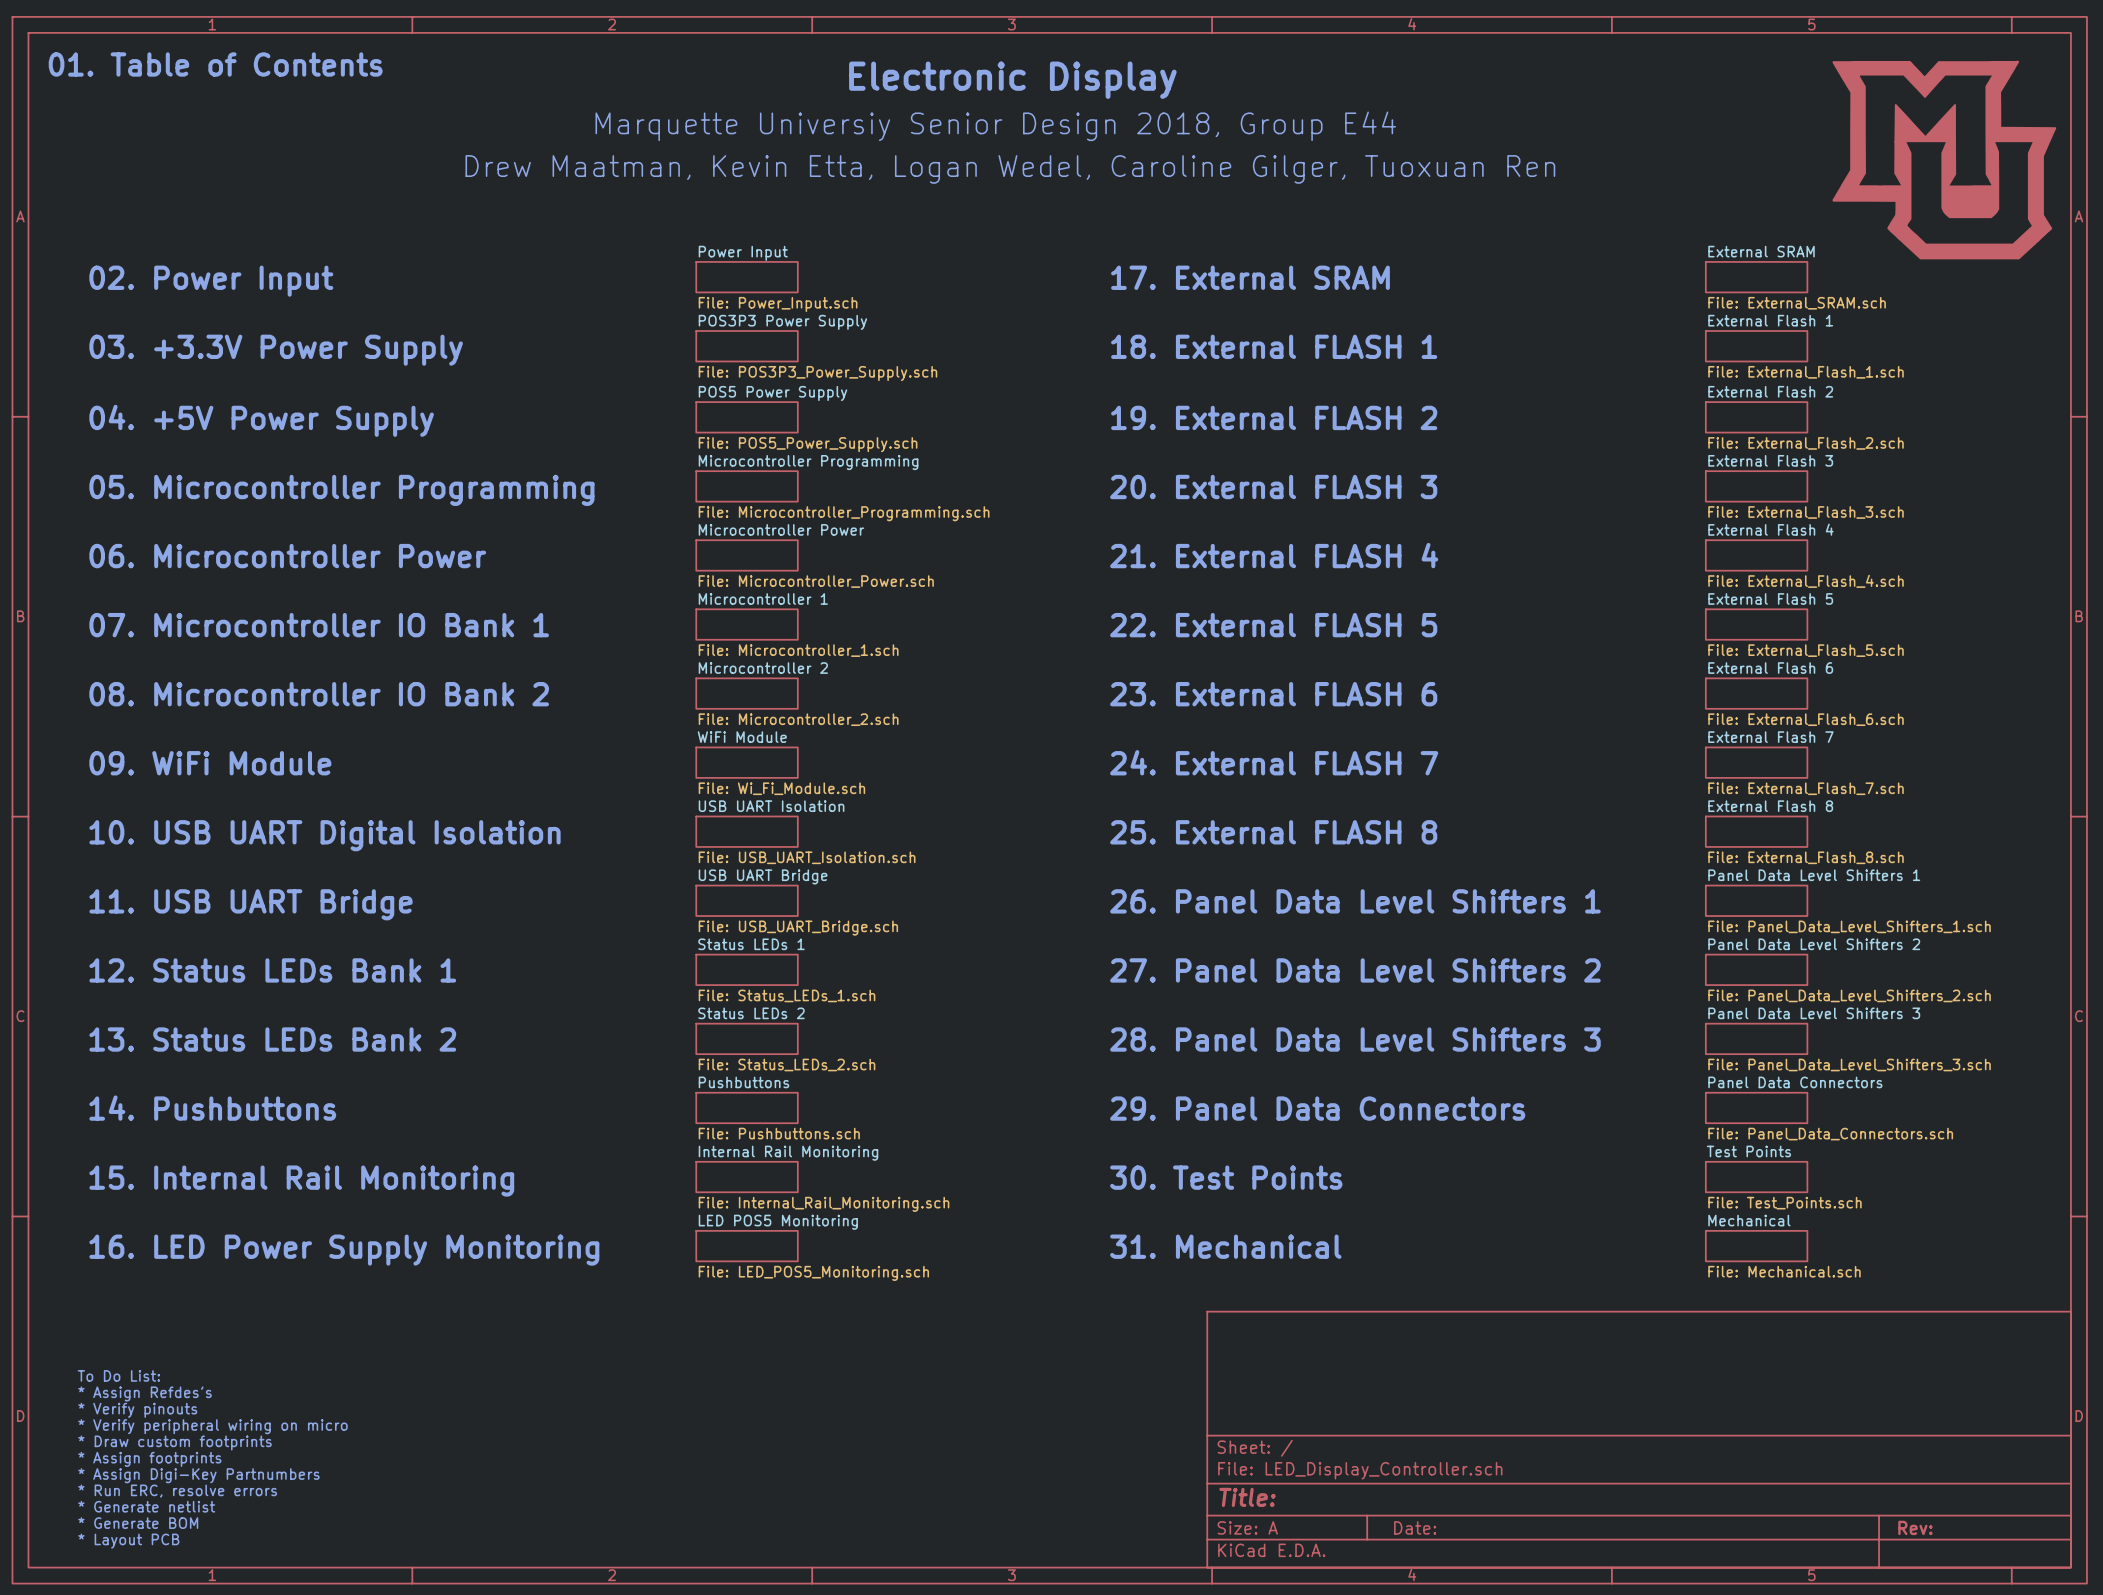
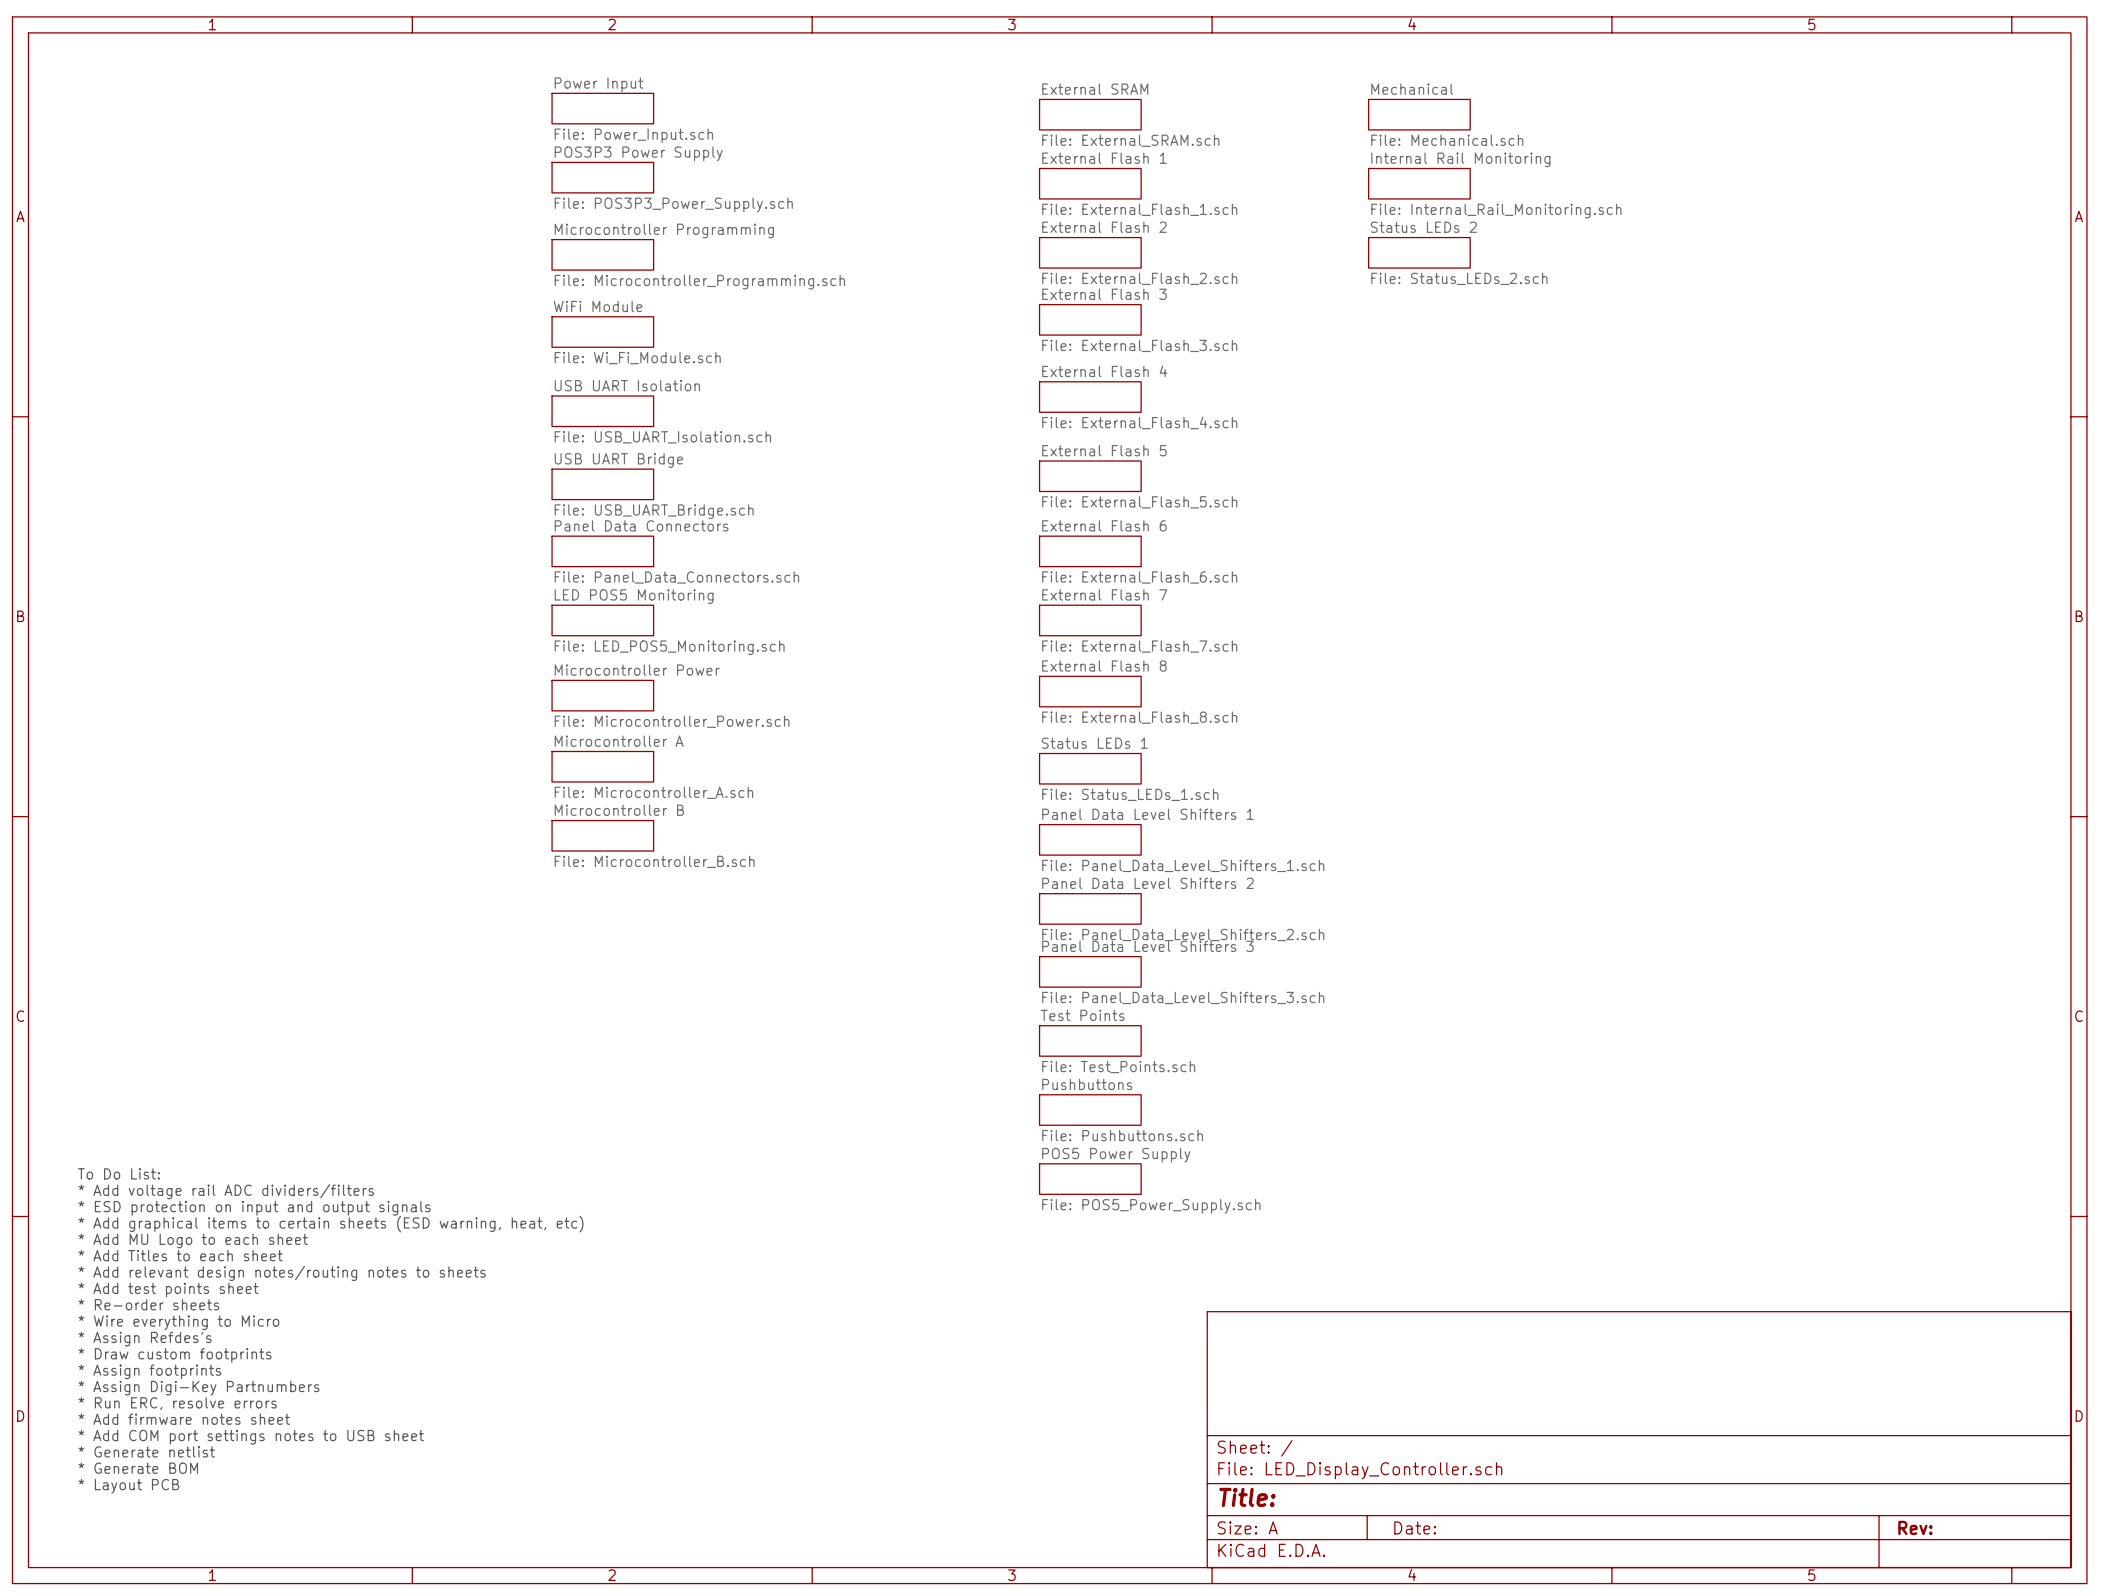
text: 01. Table of Contents (215, 64) -> none
text: Electronic Display (1012, 80) -> none
sheet Power Input: none -> File: Power_Input.sch (602, 108)
sheet External SRAM: none -> File: External_SRAM.sch (1090, 114)
sheet Mechanical: none -> File: Mechanical.sch (1419, 114)
text: Marquette Universiy Senior Design 2018, Group E44 (995, 126) -> none
power symbol: (1944, 160) -> none
text: Drew Maatman, Kevin Etta, Logan Wedel, Caroline Gilger, Tuoxuan Ren (1010, 169) -> none
sheet Internal Rail Monitoring: none -> File: Internal_Rail_Monitoring.sch (1419, 183)
sheet Microcontroller Programming: none -> File: Microcontroller_Programming.sch (602, 254)
sheet Power Input: File: Power_Input.sch (747, 277) -> none
text: 17. External SRAM (1250, 277) -> none
sheet External SRAM: File: External_SRAM.sch (1756, 277) -> none
text: 02. Power Input (211, 281) -> none
sheet WiFi Module: none -> File: Wi_Fi_Module.sch (602, 332)
sheet POS3P3 Power Supply position: (747, 346) -> (602, 177)
text: 18. External FLASH 1 (1274, 346) -> none
sheet External Flash 1 position: (1756, 346) -> (1090, 183)
text: 03. +3.3V Power Supply (276, 350) -> none
sheet USB UART Isolation: none -> File: USB_UART_Isolation.sch (602, 411)
sheet POS5 Power Supply position: (747, 417) -> (1090, 1179)
text: 19. External FLASH 2 (1274, 417) -> none
sheet External Flash 2 position: (1756, 417) -> (1090, 252)
text: 04. +5V Power Supply (261, 420) -> none
sheet USB UART Bridge: none -> File: USB_UART_Bridge.sch (602, 484)
sheet Microcontroller Programming: File: Microcontroller_Programming.sch (747, 486) -> none
text: 20. External FLASH 3 (1273, 486) -> none
sheet External Flash 3 position: (1756, 486) -> (1090, 319)
text: 05. Microcontroller Programming (341, 490) -> none
sheet Panel Data Connectors: none -> File: Panel_Data_Connectors.sch (602, 551)
sheet Microcontroller Power: File: Microcontroller_Power.sch (747, 555) -> none
text: 21. External FLASH 4 (1274, 555) -> none
sheet External Flash 4 position: (1756, 555) -> (1090, 397)
text: 06. Microcontroller Power (287, 556) -> none
sheet Microcontroller 1: File: Microcontroller_1.sch (747, 624) -> none
sheet External Flash 5 position: (1756, 624) -> (1090, 476)
text: 07. Microcontroller IO Bank 1 (319, 625) -> none
text: 22. External FLASH 5 (1273, 625) -> none
sheet Microcontroller 2: File: Microcontroller_2.sch (747, 693) -> none
sheet External Flash 6 position: (1756, 693) -> (1090, 551)
text: 08. Microcontroller IO Bank 2 (319, 694) -> none
text: 23. External FLASH 6 (1273, 694) -> none
sheet Microcontroller Power: none -> File: Microcontroller_Power.sch (602, 695)
sheet WiFi Module: File: Wi_Fi_Module.sch (747, 762) -> none
text: 24. External FLASH 7 (1274, 762) -> none
sheet External Flash 7 position: (1756, 762) -> (1090, 620)
text: 09. WiFi Module (210, 763) -> none
sheet Microcontroller A: none -> File: Microcontroller_A.sch (602, 766)
sheet USB UART Isolation: File: USB_UART_Isolation.sch (747, 831) -> none
sheet External Flash 8 position: (1756, 831) -> (1090, 691)
text: 25. External FLASH 8 (1273, 832) -> none
text: 10. USB UART Digital Isolation (324, 835) -> none
sheet Microcontroller B: none -> File: Microcontroller_B.sch (602, 835)
sheet USB UART Bridge: File: USB_UART_Bridge.sch (747, 900) -> none
sheet Panel Data Level Shifters 1 position: (1756, 900) -> (1090, 839)
text: 26. Panel Data Level Shifters 1 (1355, 901) -> none
text: 11. USB UART Bridge (250, 904) -> none
sheet Status LEDs 1 position: (747, 969) -> (1090, 768)
sheet Panel Data Level Shifters 2 position: (1756, 969) -> (1090, 908)
text: 12. Status LEDs Bank 1 (272, 970) -> none
text: 27. Panel Data Level Shifters 2 (1355, 970) -> none
sheet Status LEDs 2 position: (747, 1038) -> (1419, 252)
sheet Panel Data Level Shifters 3 position: (1756, 1038) -> (1090, 971)
text: 13. Status LEDs Bank 2 (272, 1039) -> none
text: 28. Panel Data Level Shifters 3 (1355, 1039) -> none
sheet Test Points: none -> File: Test_Points.sch (1090, 1040)
sheet Pushbuttons: File: Pushbuttons.sch (747, 1107) -> none
sheet Panel Data Connectors: File: Panel_Data_Connectors.sch (1756, 1107) -> none
text: 14. Pushbuttons (212, 1108) -> none
text: 29. Panel Data Connectors (1317, 1108) -> none
sheet Pushbuttons: none -> File: Pushbuttons.sch (1090, 1110)
text: none -> To Do List: (118, 1173)
sheet Internal Rail Monitoring: File: Internal_Rail_Monitoring.sch (747, 1177) -> none
text: 30. Test Points (1226, 1177) -> none
sheet Test Points: File: Test_Points.sch (1756, 1177) -> none
text: 15. Internal Rail Monitoring (301, 1181) -> none
text: none -> * Add voltage rail ADC dividers/filters (226, 1191)
text: none -> * ESD protection on input and output signals (254, 1208)
text: none -> * Add graphical items to certain sheets (ESD warning, heat, etc) (330, 1224)
text: none -> * Add MU Logo to each sheet (193, 1241)
sheet LED POS5 Monitoring position: (747, 1246) -> (602, 620)
text: 31. Mechanical (1225, 1246) -> none
sheet Mechanical: File: Mechanical.sch (1756, 1246) -> none
text: 16. LED Power Supply Monitoring (344, 1250) -> none
text: none -> * Add Titles to each sheet (180, 1255)
text: none -> * Add relevant design notes/routing notes to sheets (282, 1273)
text: none -> * Add test points sheet (168, 1290)
text: none -> * Re-order sheets (148, 1304)
text: none -> * Wire everything to Micro (178, 1322)
text: To Do List: (118, 1375) -> none
text position: * Assign Refdes's (144, 1393) -> * Assign Refdes's (144, 1339)
text: * Verify pinouts (137, 1410) -> none
text: none -> * Add firmware notes sheet (184, 1419)
text: * Verify peripheral wiring on micro (212, 1426) -> none
text: none -> * Add COM port settings notes to USB sheet (251, 1437)
text position: * Draw custom footprints (174, 1443) -> * Draw custom footprints (174, 1355)
text position: * Assign footprints (149, 1459) -> * Assign footprints (149, 1371)
text position: * Assign Digi-Key Partnumbers (198, 1475) -> * Assign Digi-Key Partnumbers (198, 1388)
text position: * Run ERC, resolve errors (177, 1491) -> * Run ERC, resolve errors (177, 1403)
text position: * Generate netlist (146, 1506) -> * Generate netlist (146, 1451)
text position: * Generate BOM (138, 1523) -> * Generate BOM (138, 1468)
text position: * Layout PCB (128, 1541) -> * Layout PCB (128, 1486)

